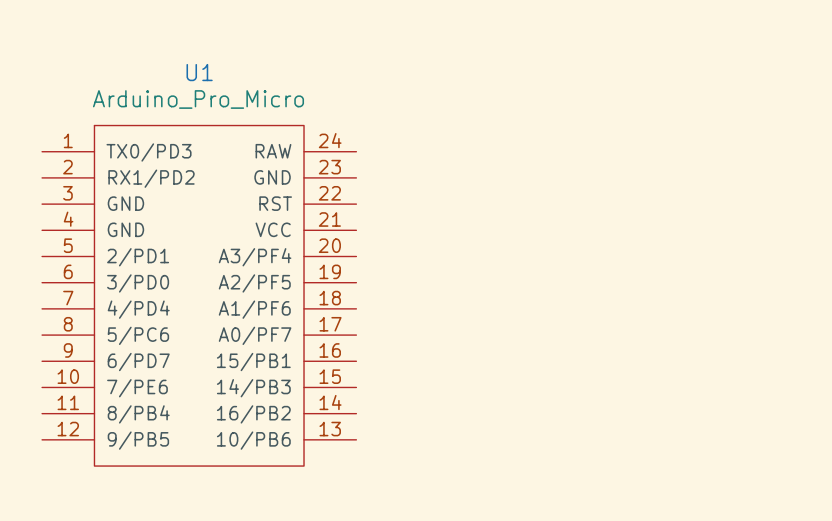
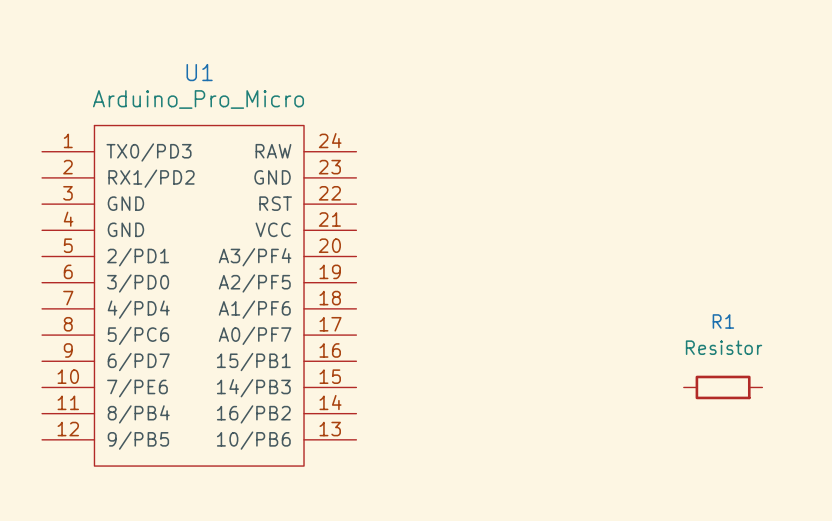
R1: none -> Resistor (723, 387)

